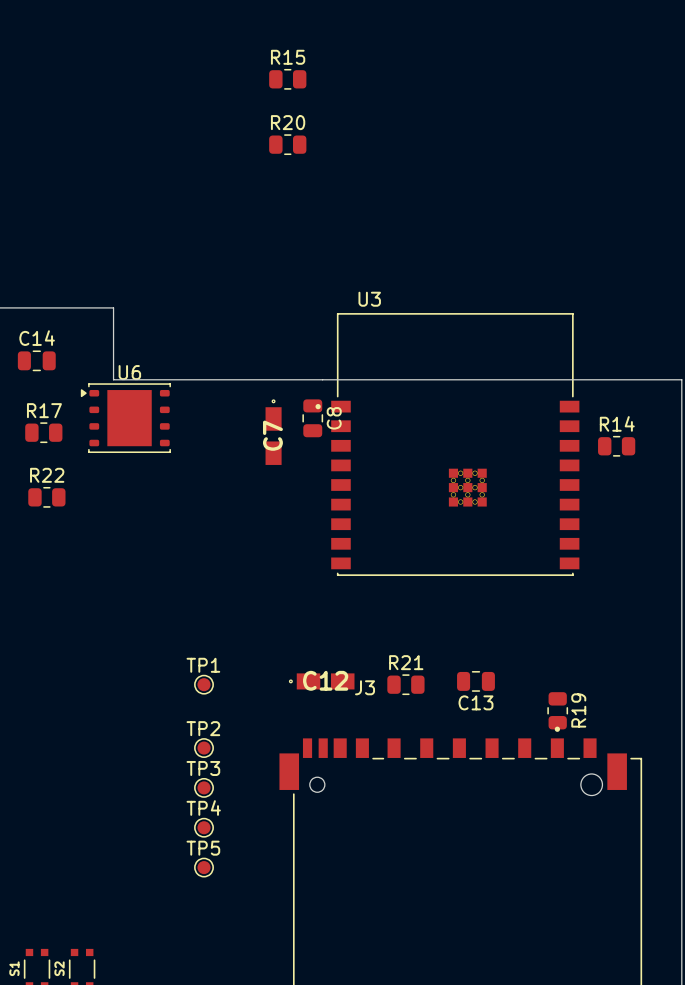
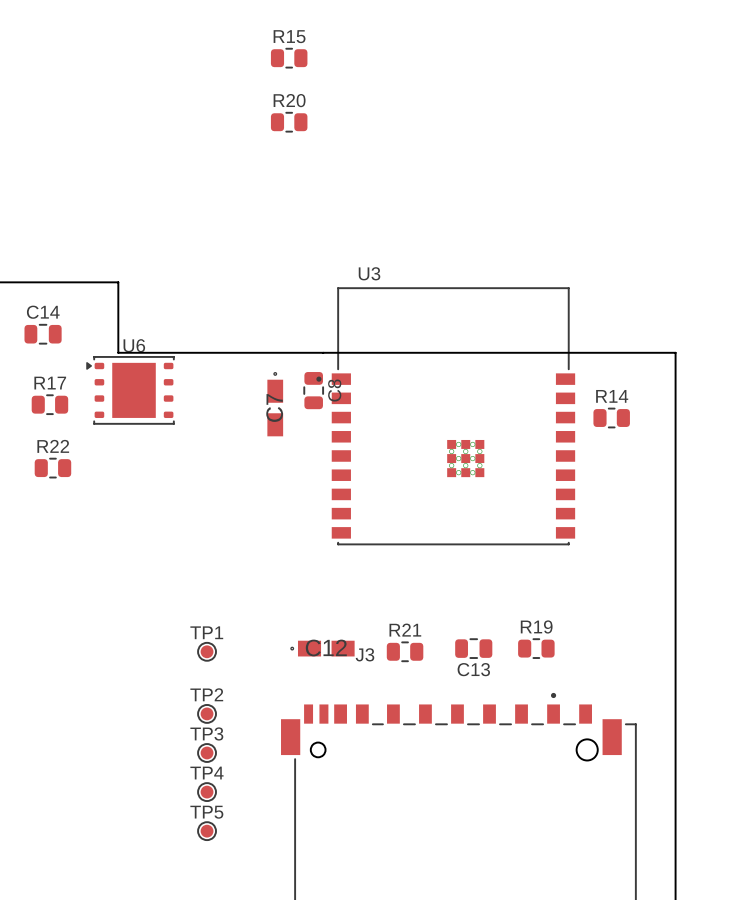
R19 rotation: 0° (557, 710) -> 90° clockwise (536, 648)
R19 position: (557, 710) -> (536, 648)
R19 name position: R19 (578, 710) -> R19 (536, 626)

